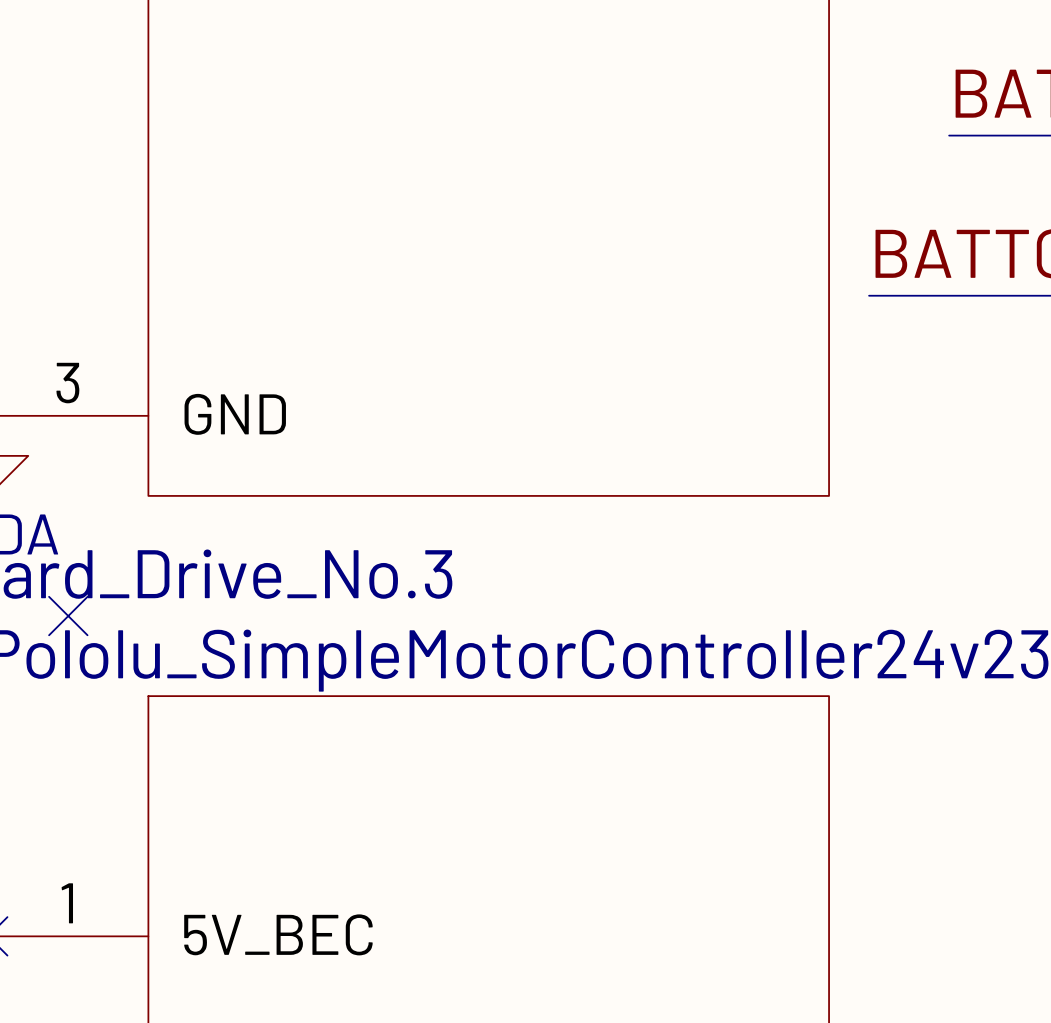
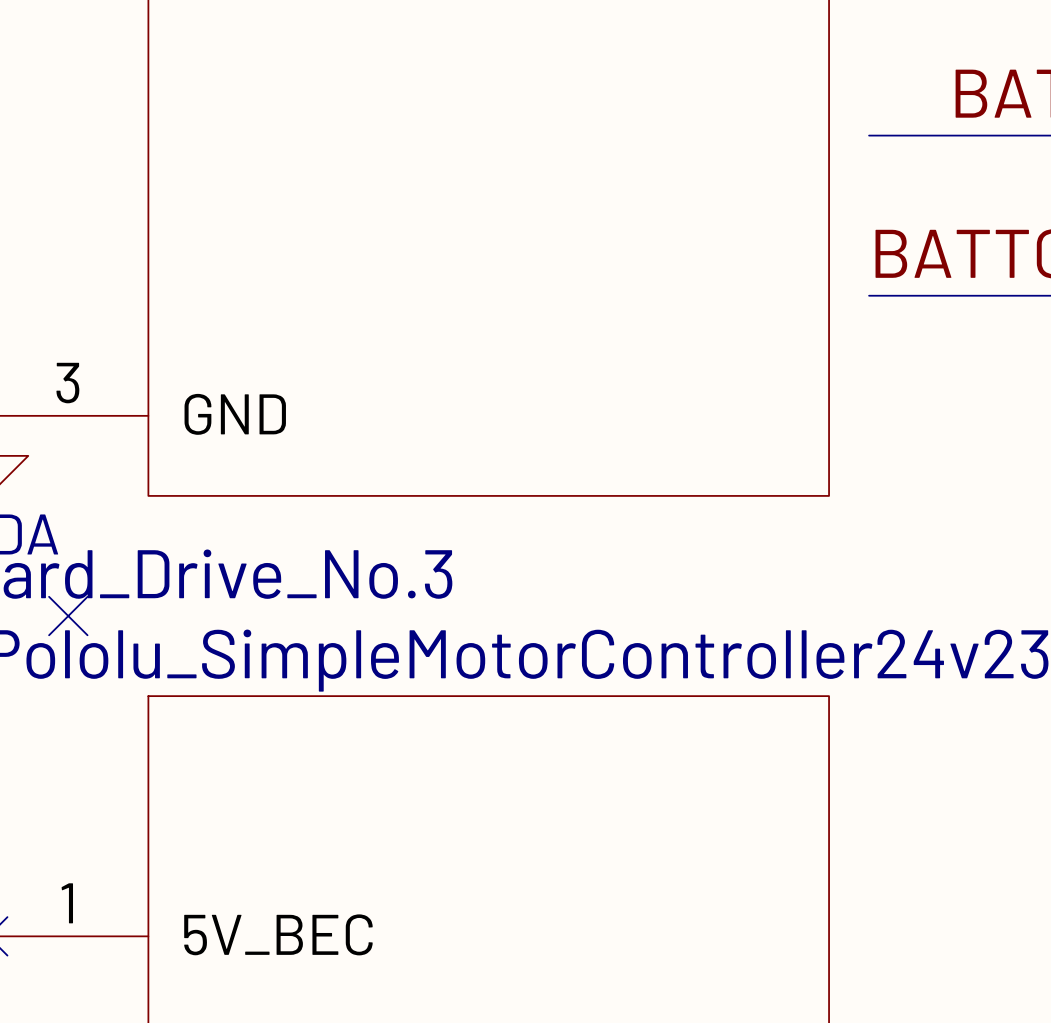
wire: none -> (869, 135) (949, 135)

